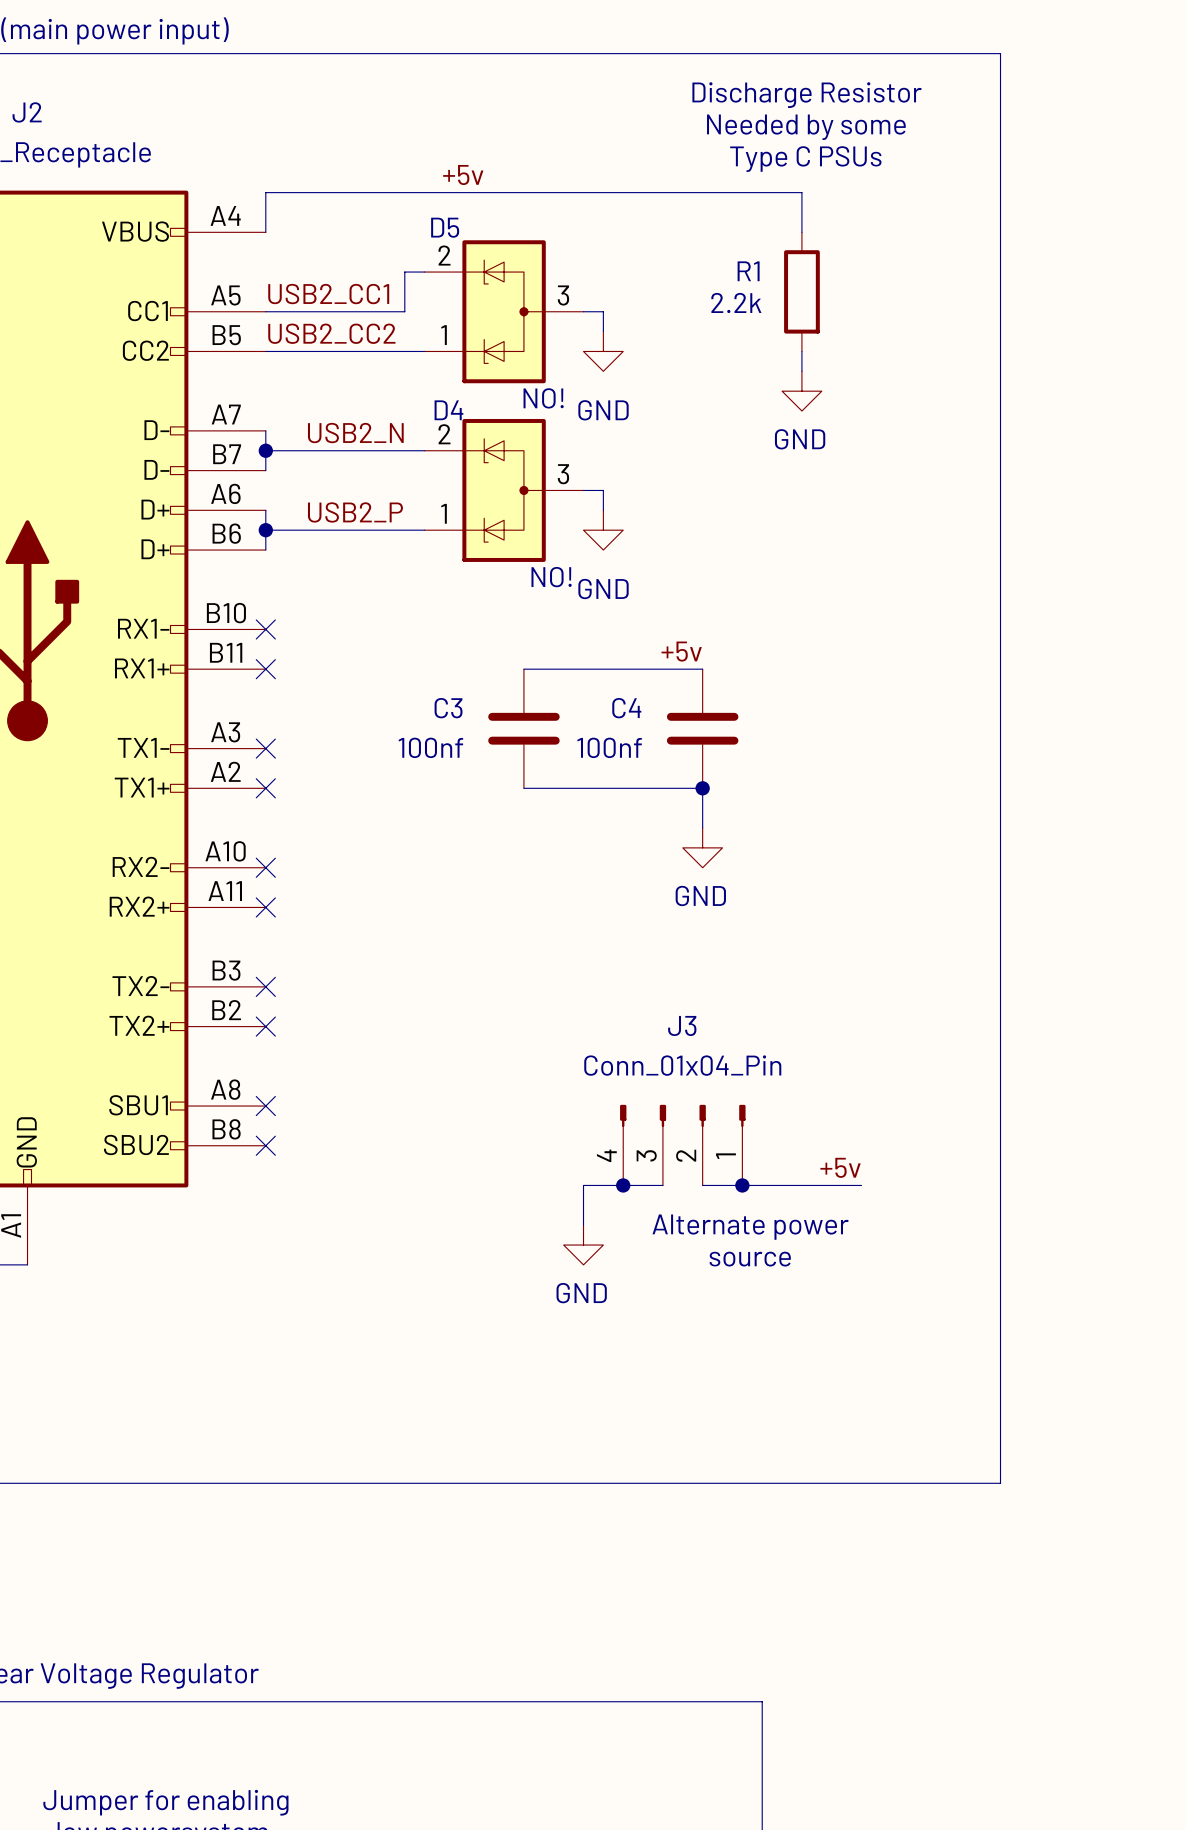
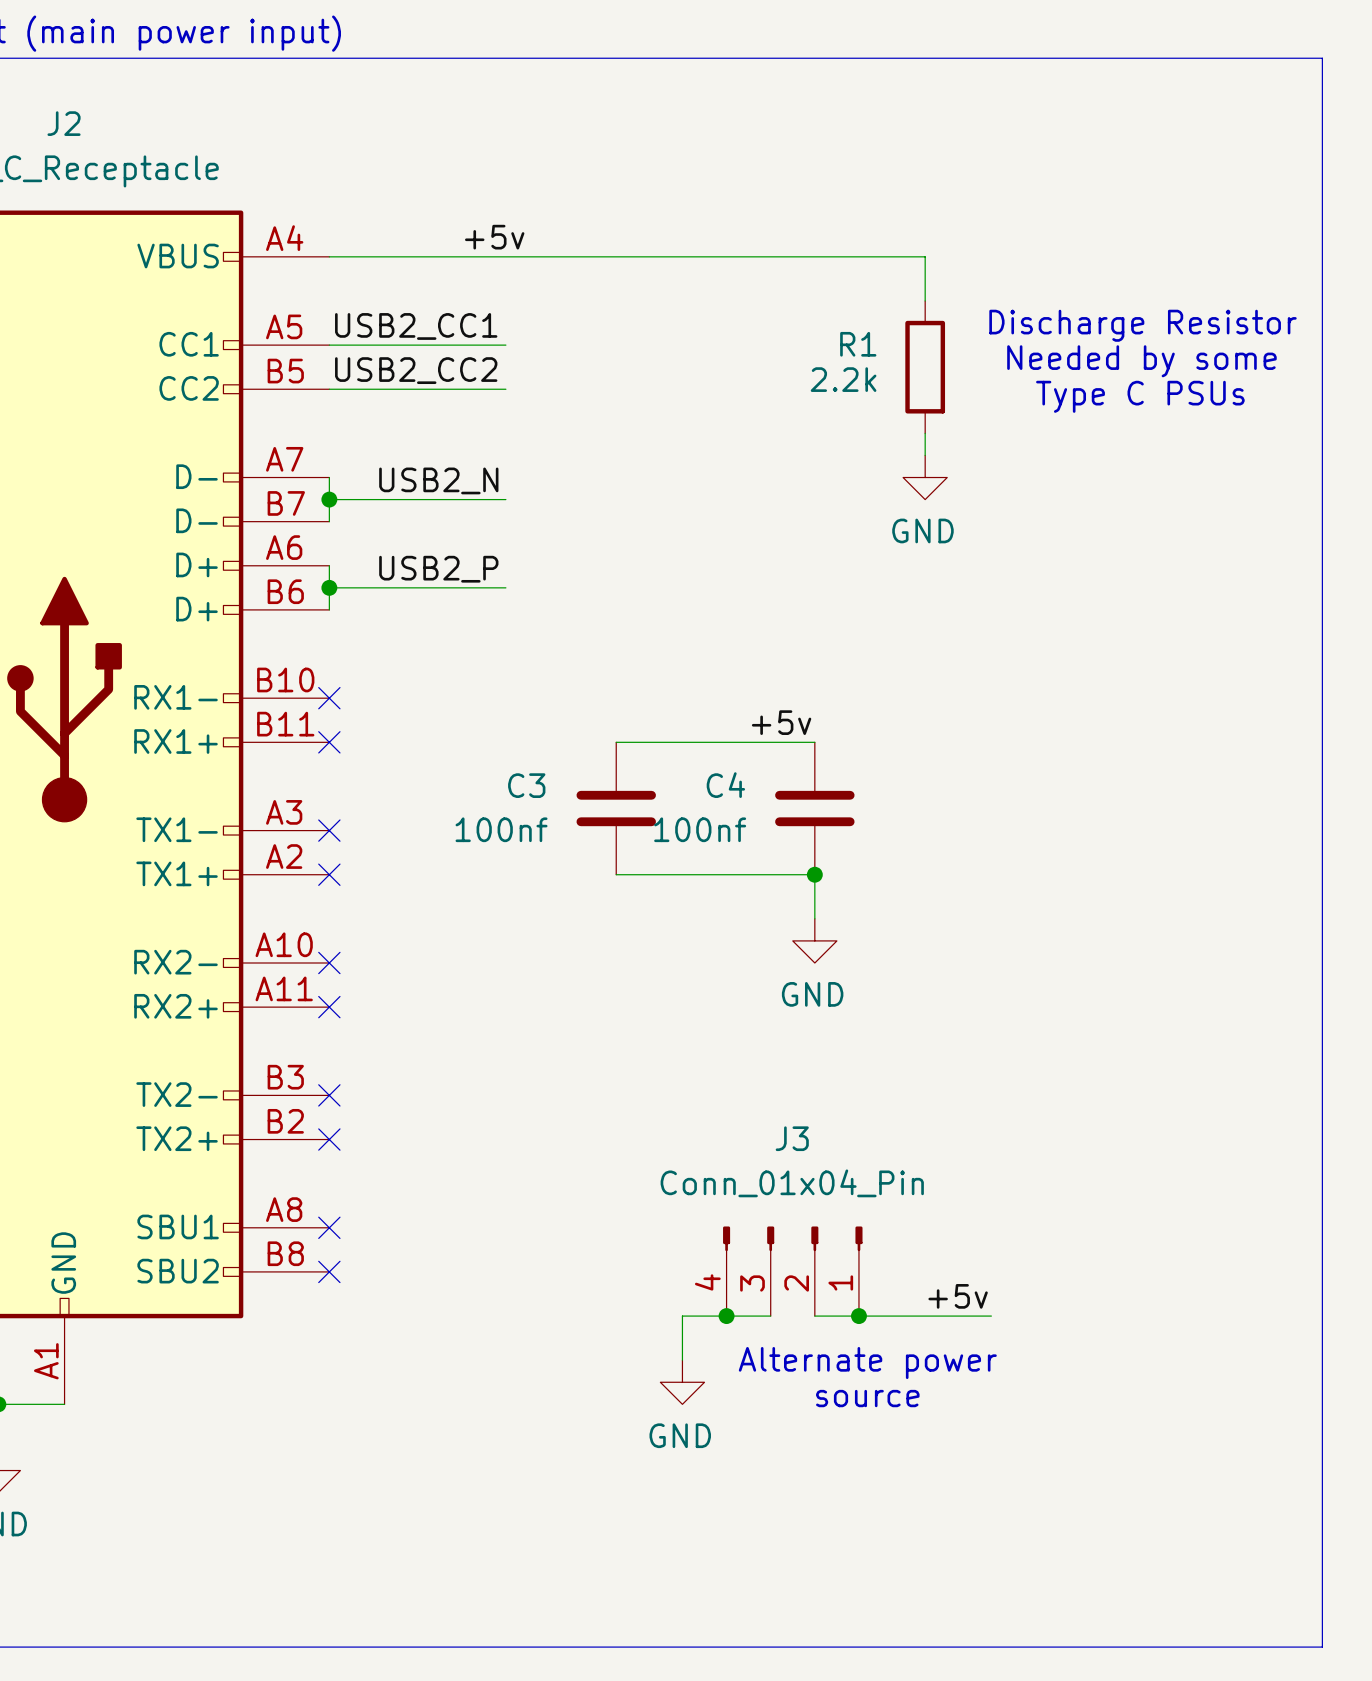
line: (1000, 53) (1000, 1483) -> (1145, 58) (1322, 58) (1322, 1647) (1145, 1647)
text position: Discharge Resistor (807, 95) -> Discharge Resistor (1143, 325)
text position: Needed by some (806, 127) -> Needed by some (1141, 361)
text position: Type C PSUs (805, 159) -> Type C PSUs (1140, 396)
label position: +5v (463, 174) -> +5v (494, 237)
wire: (265, 232) (265, 192) (801, 192) (801, 232) -> (329, 256) (925, 256) (925, 300)
wire: (424, 272) (404, 272) (404, 311) -> (505, 345) (483, 345)
R1 position: (801, 291) -> (925, 367)
D5: (504, 311) -> none
wire: (583, 311) (603, 311) (603, 331) -> none
power symbol: GND (603, 351) -> none
wire: (801, 351) (801, 371) -> (925, 433) (925, 455)
power symbol position: GND (801, 391) -> GND (925, 477)
D4: (504, 490) -> none
wire: (583, 490) (603, 490) (603, 510) -> none
power symbol: GND (603, 530) -> none

